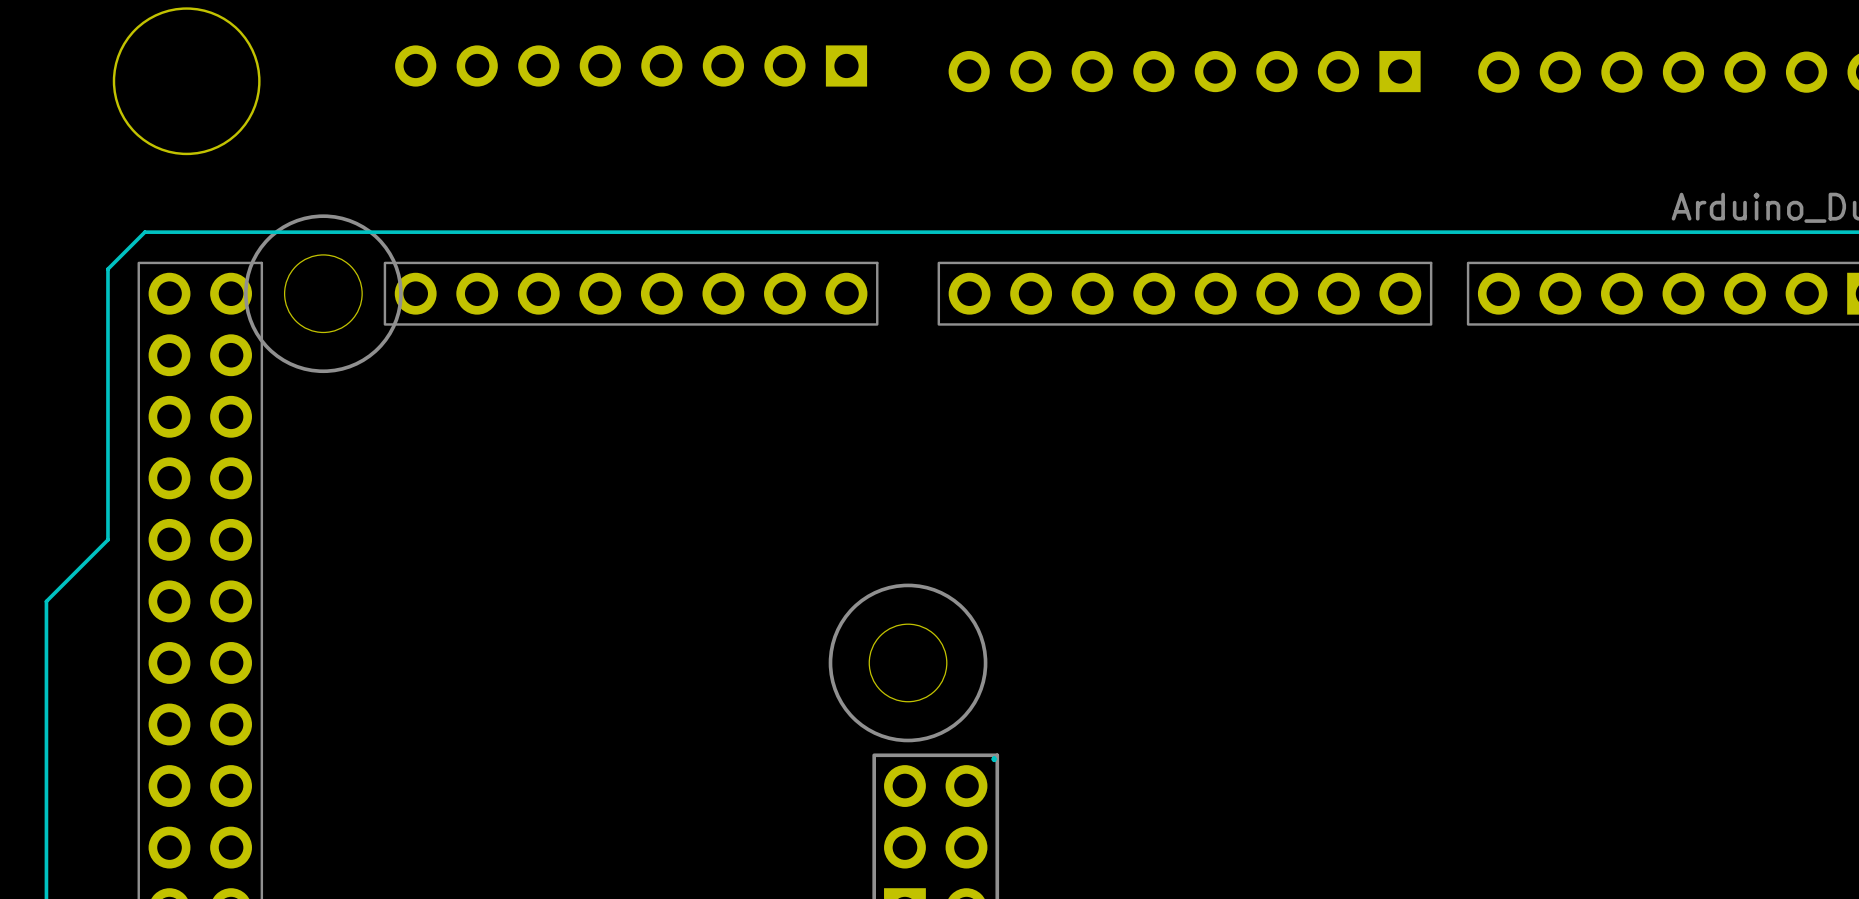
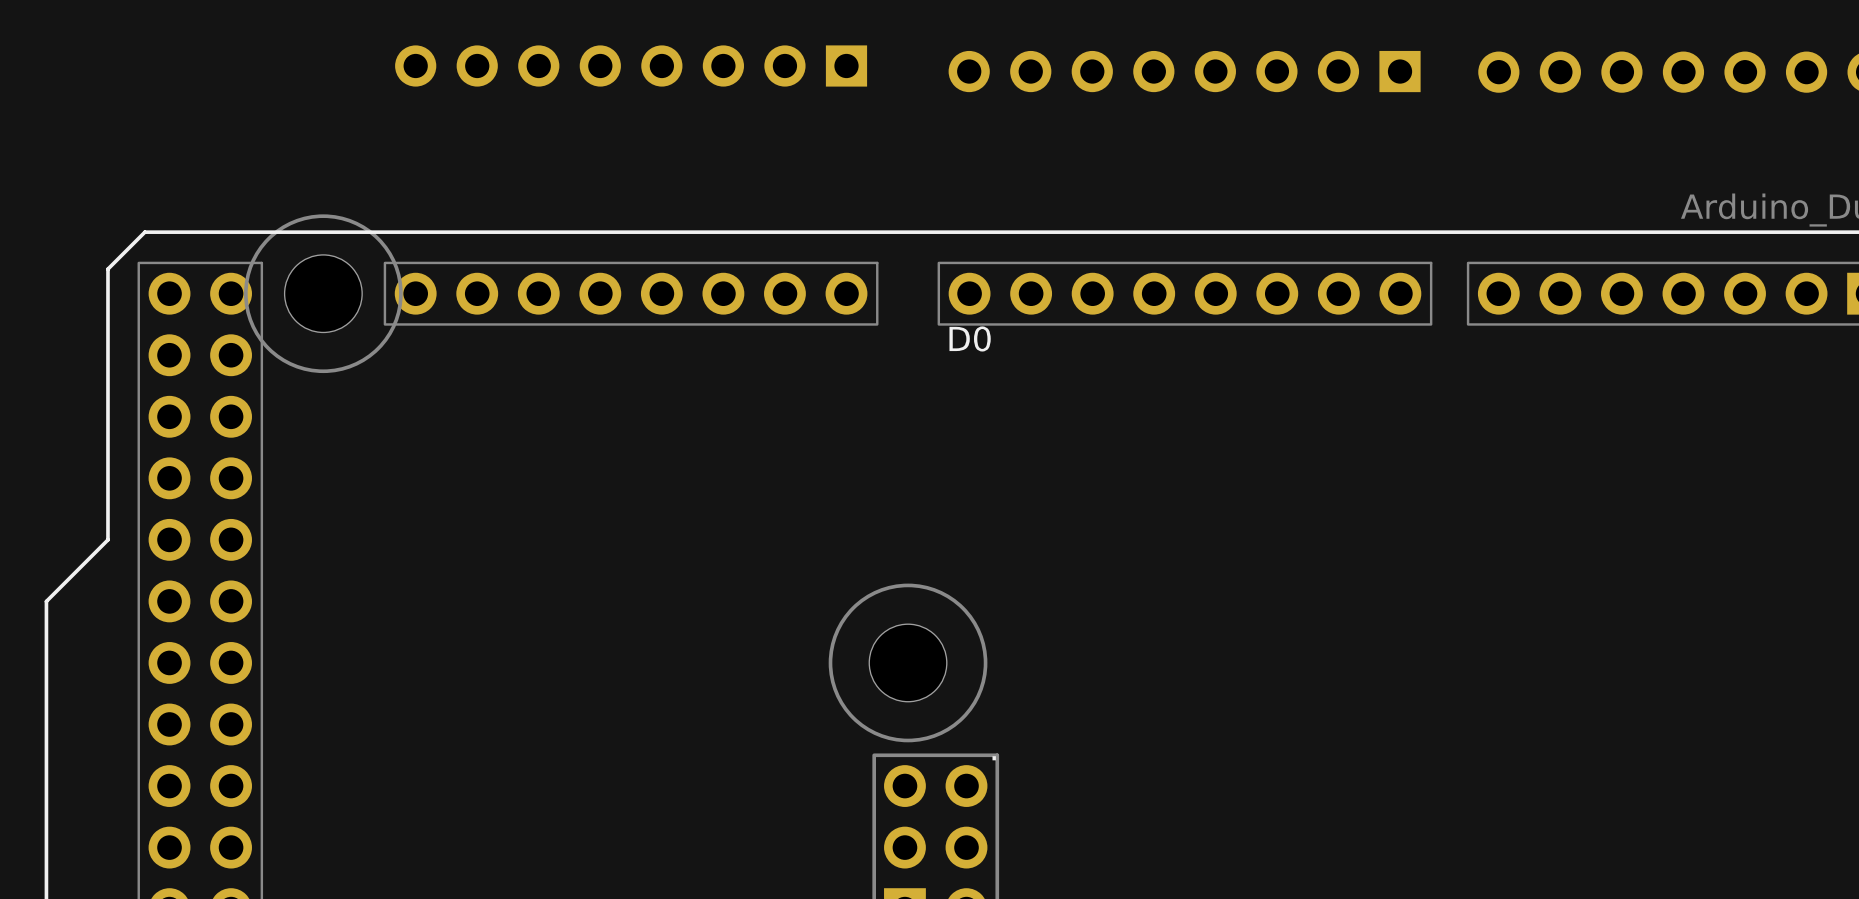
round board edge: [112, 7, 261, 156] -> none
part text: none -> D0 (970, 338)

